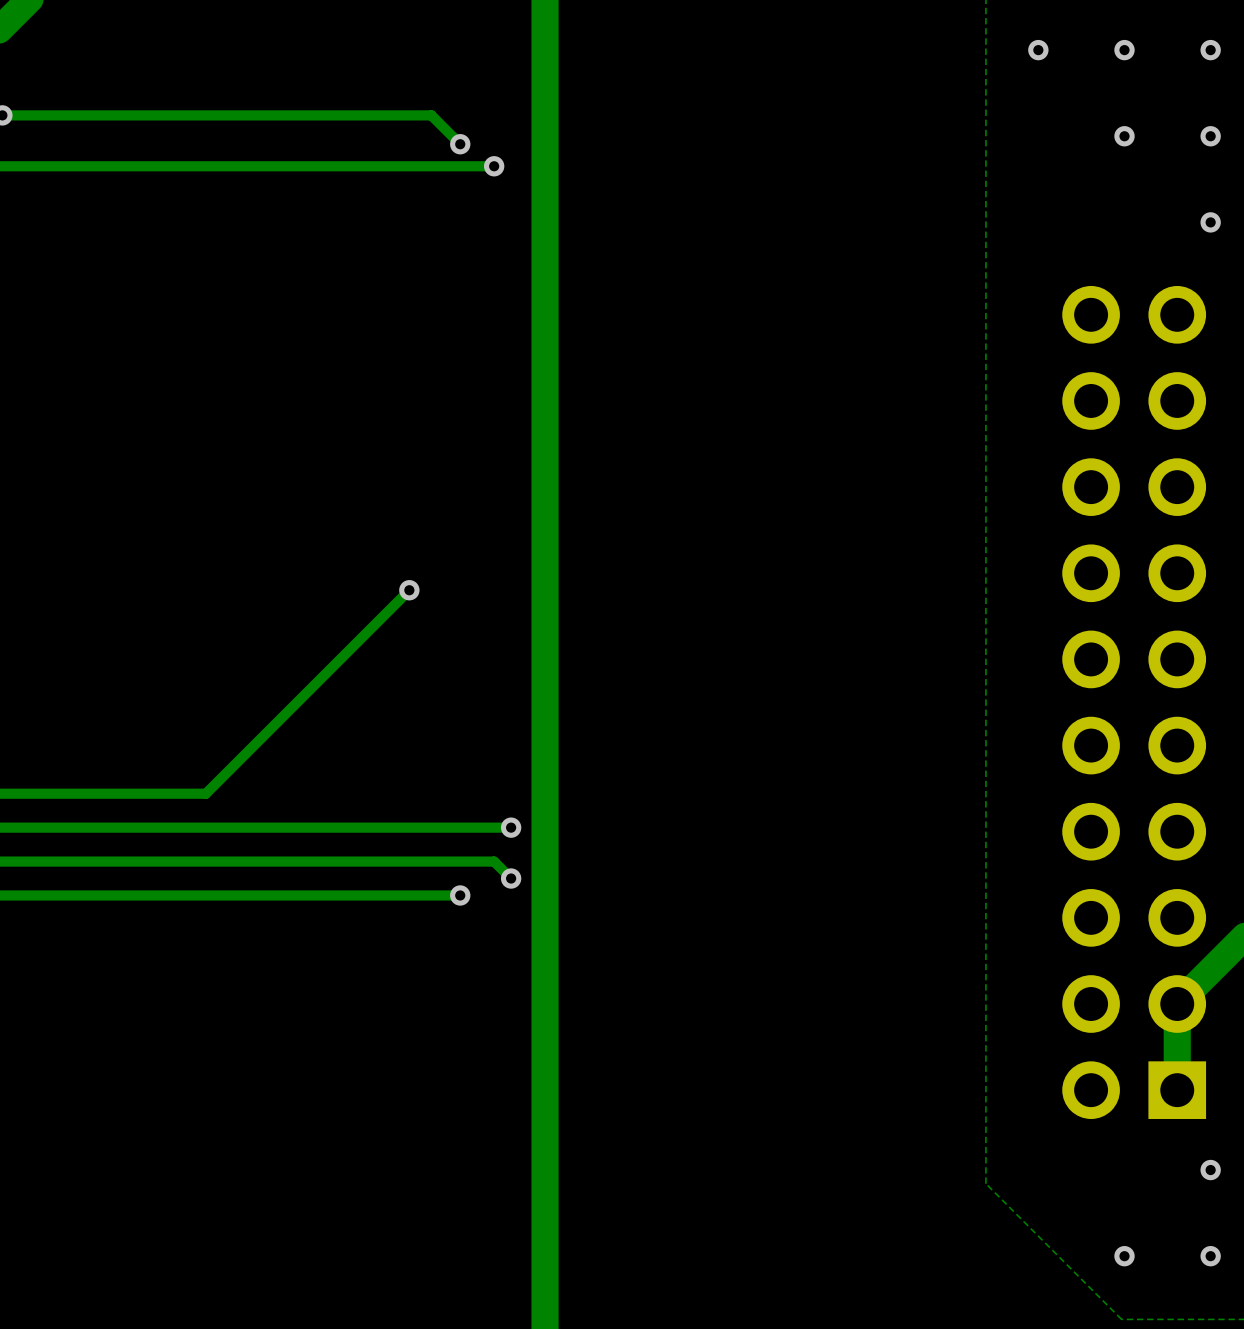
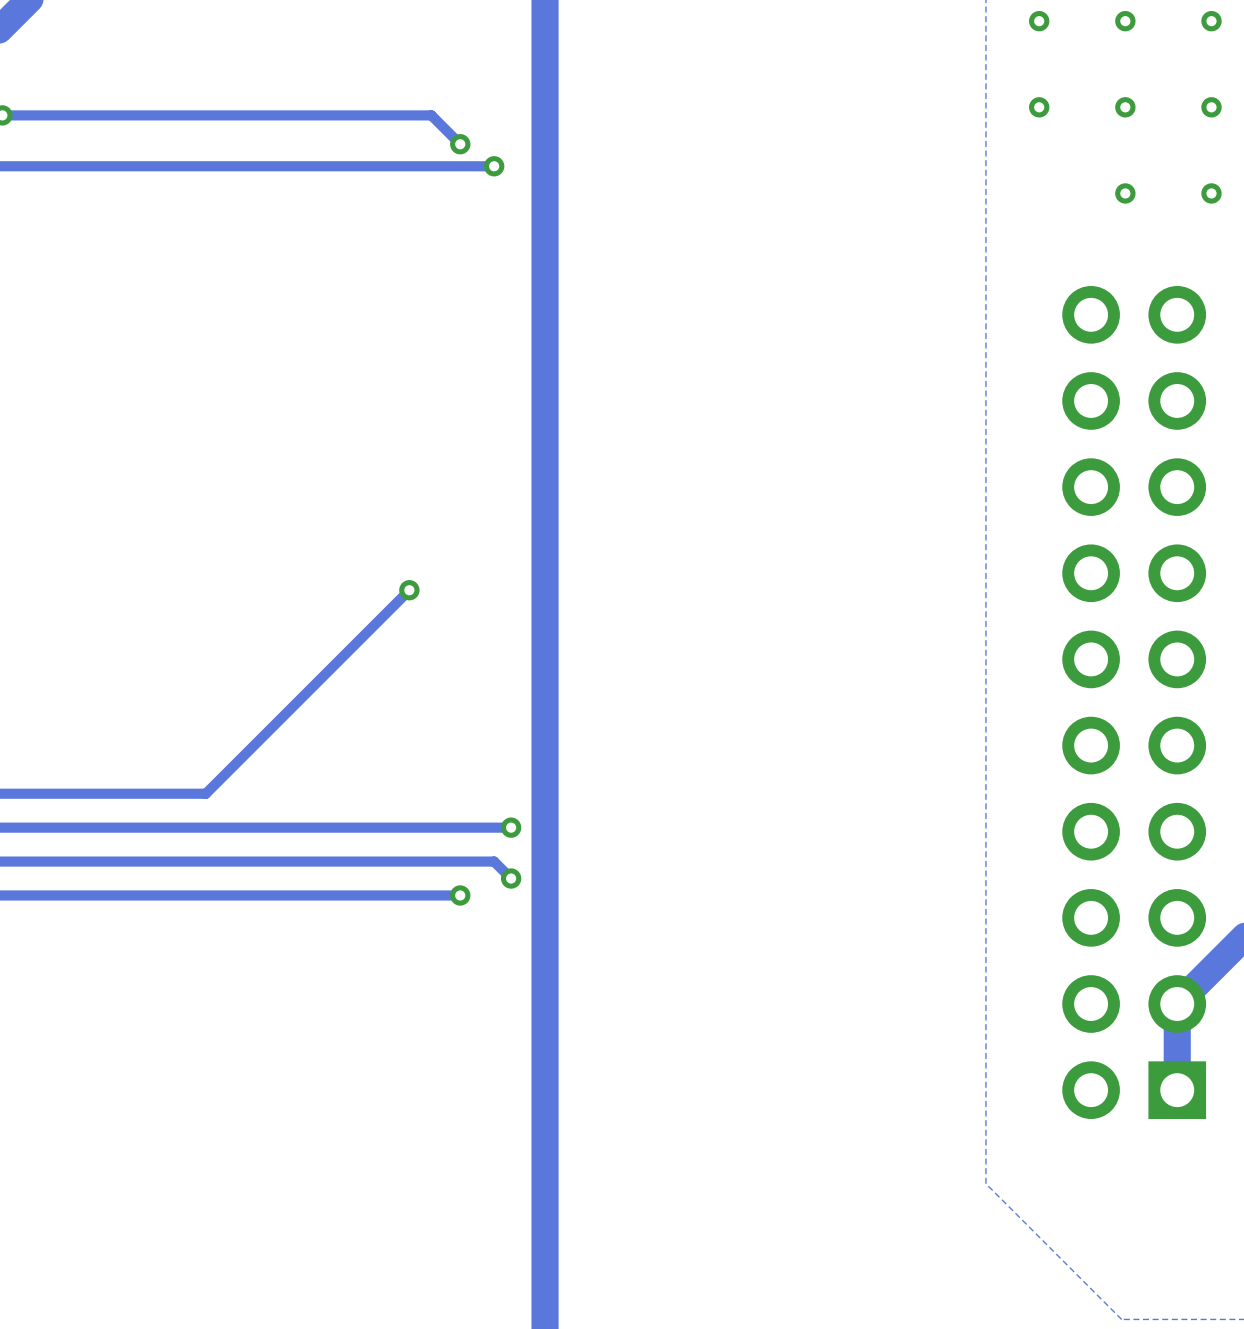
via: none -> (1039, 21)
via: none -> (1125, 21)
via: none -> (1211, 21)
via: (1038, 50) -> none
via: (1124, 50) -> none
via: (1210, 50) -> none
via: none -> (1039, 107)
via: none -> (1125, 107)
via: none -> (1211, 107)
via: (1124, 136) -> none
via: (1210, 136) -> none
via: none -> (1125, 193)
via: none -> (1211, 193)
via: (1210, 222) -> none
via: (1210, 1170) -> none
via: (1124, 1256) -> none
via: (1210, 1256) -> none

